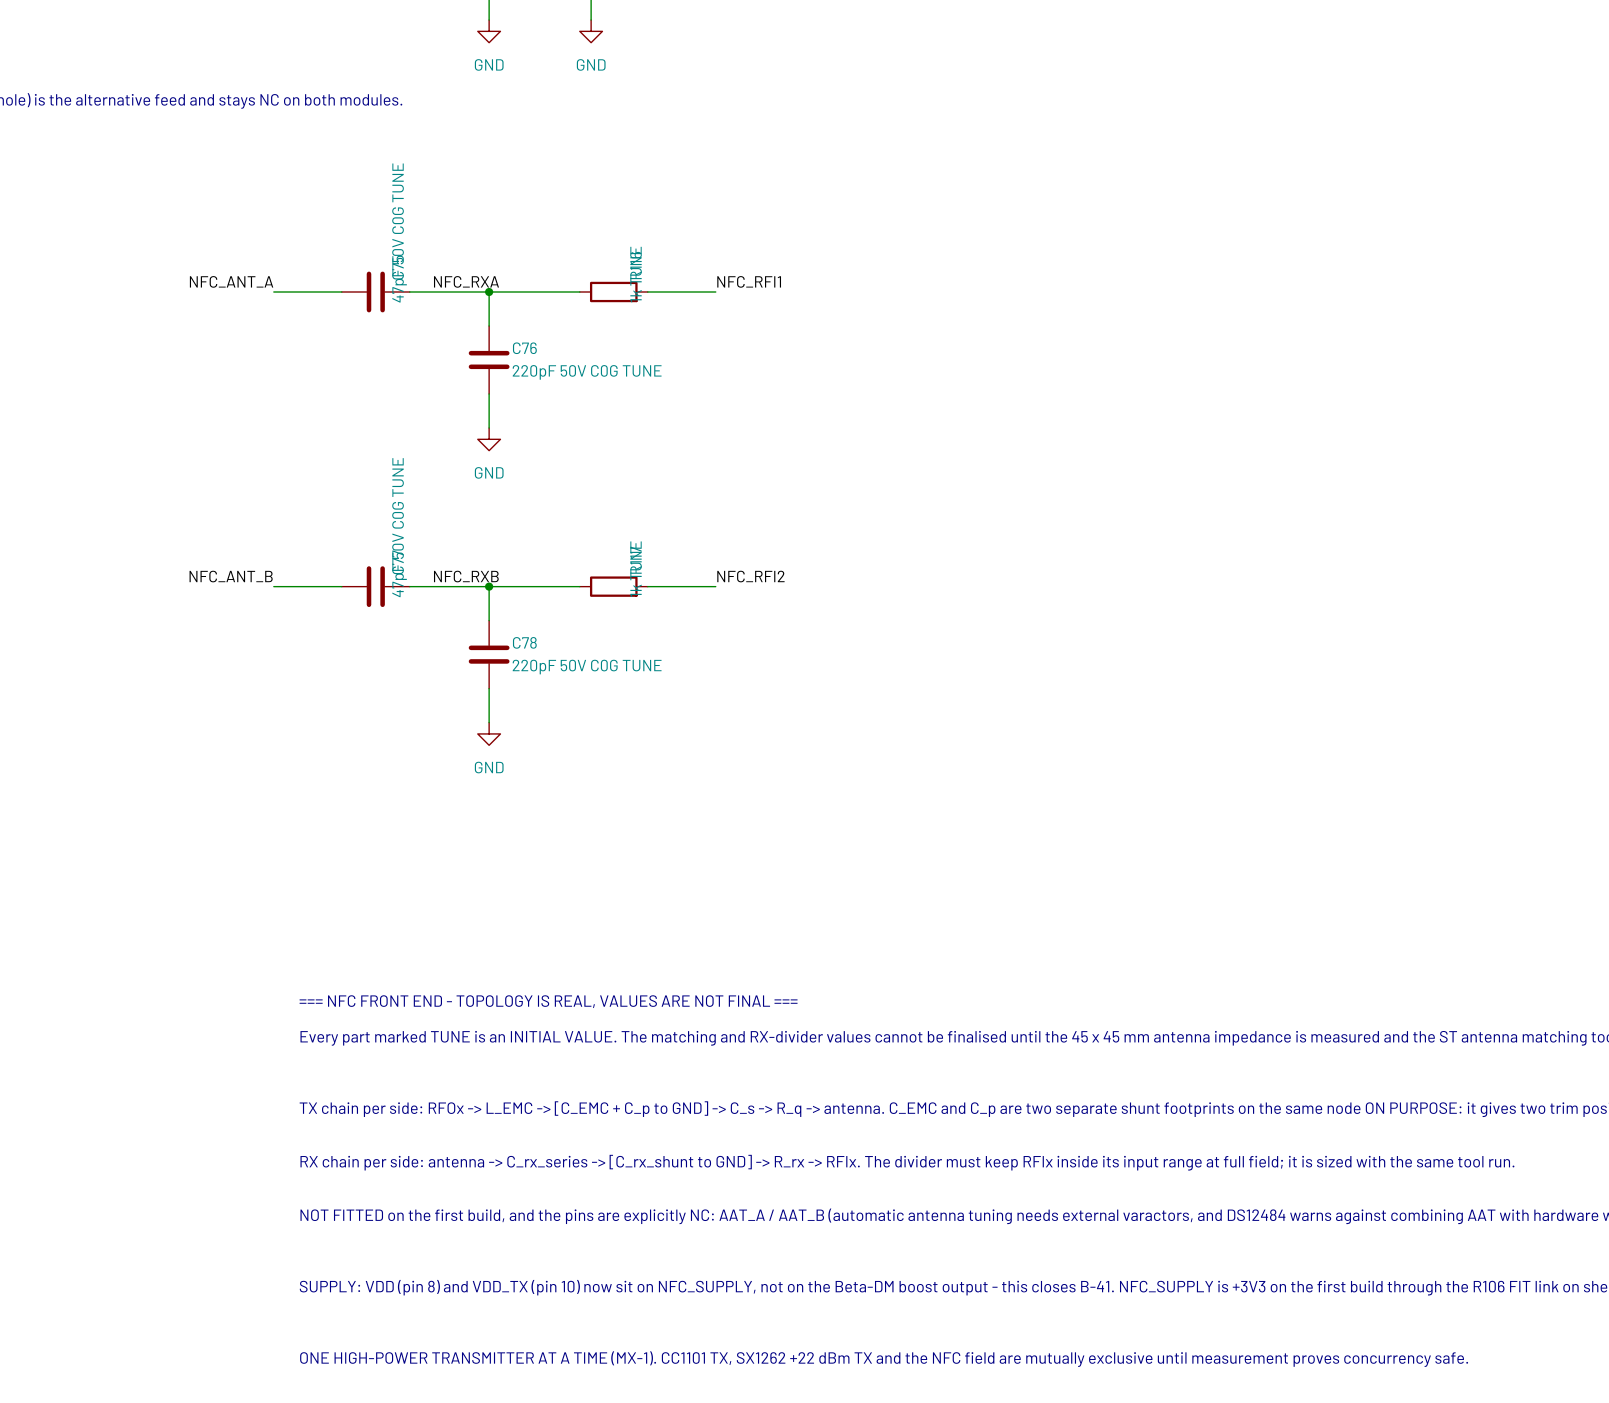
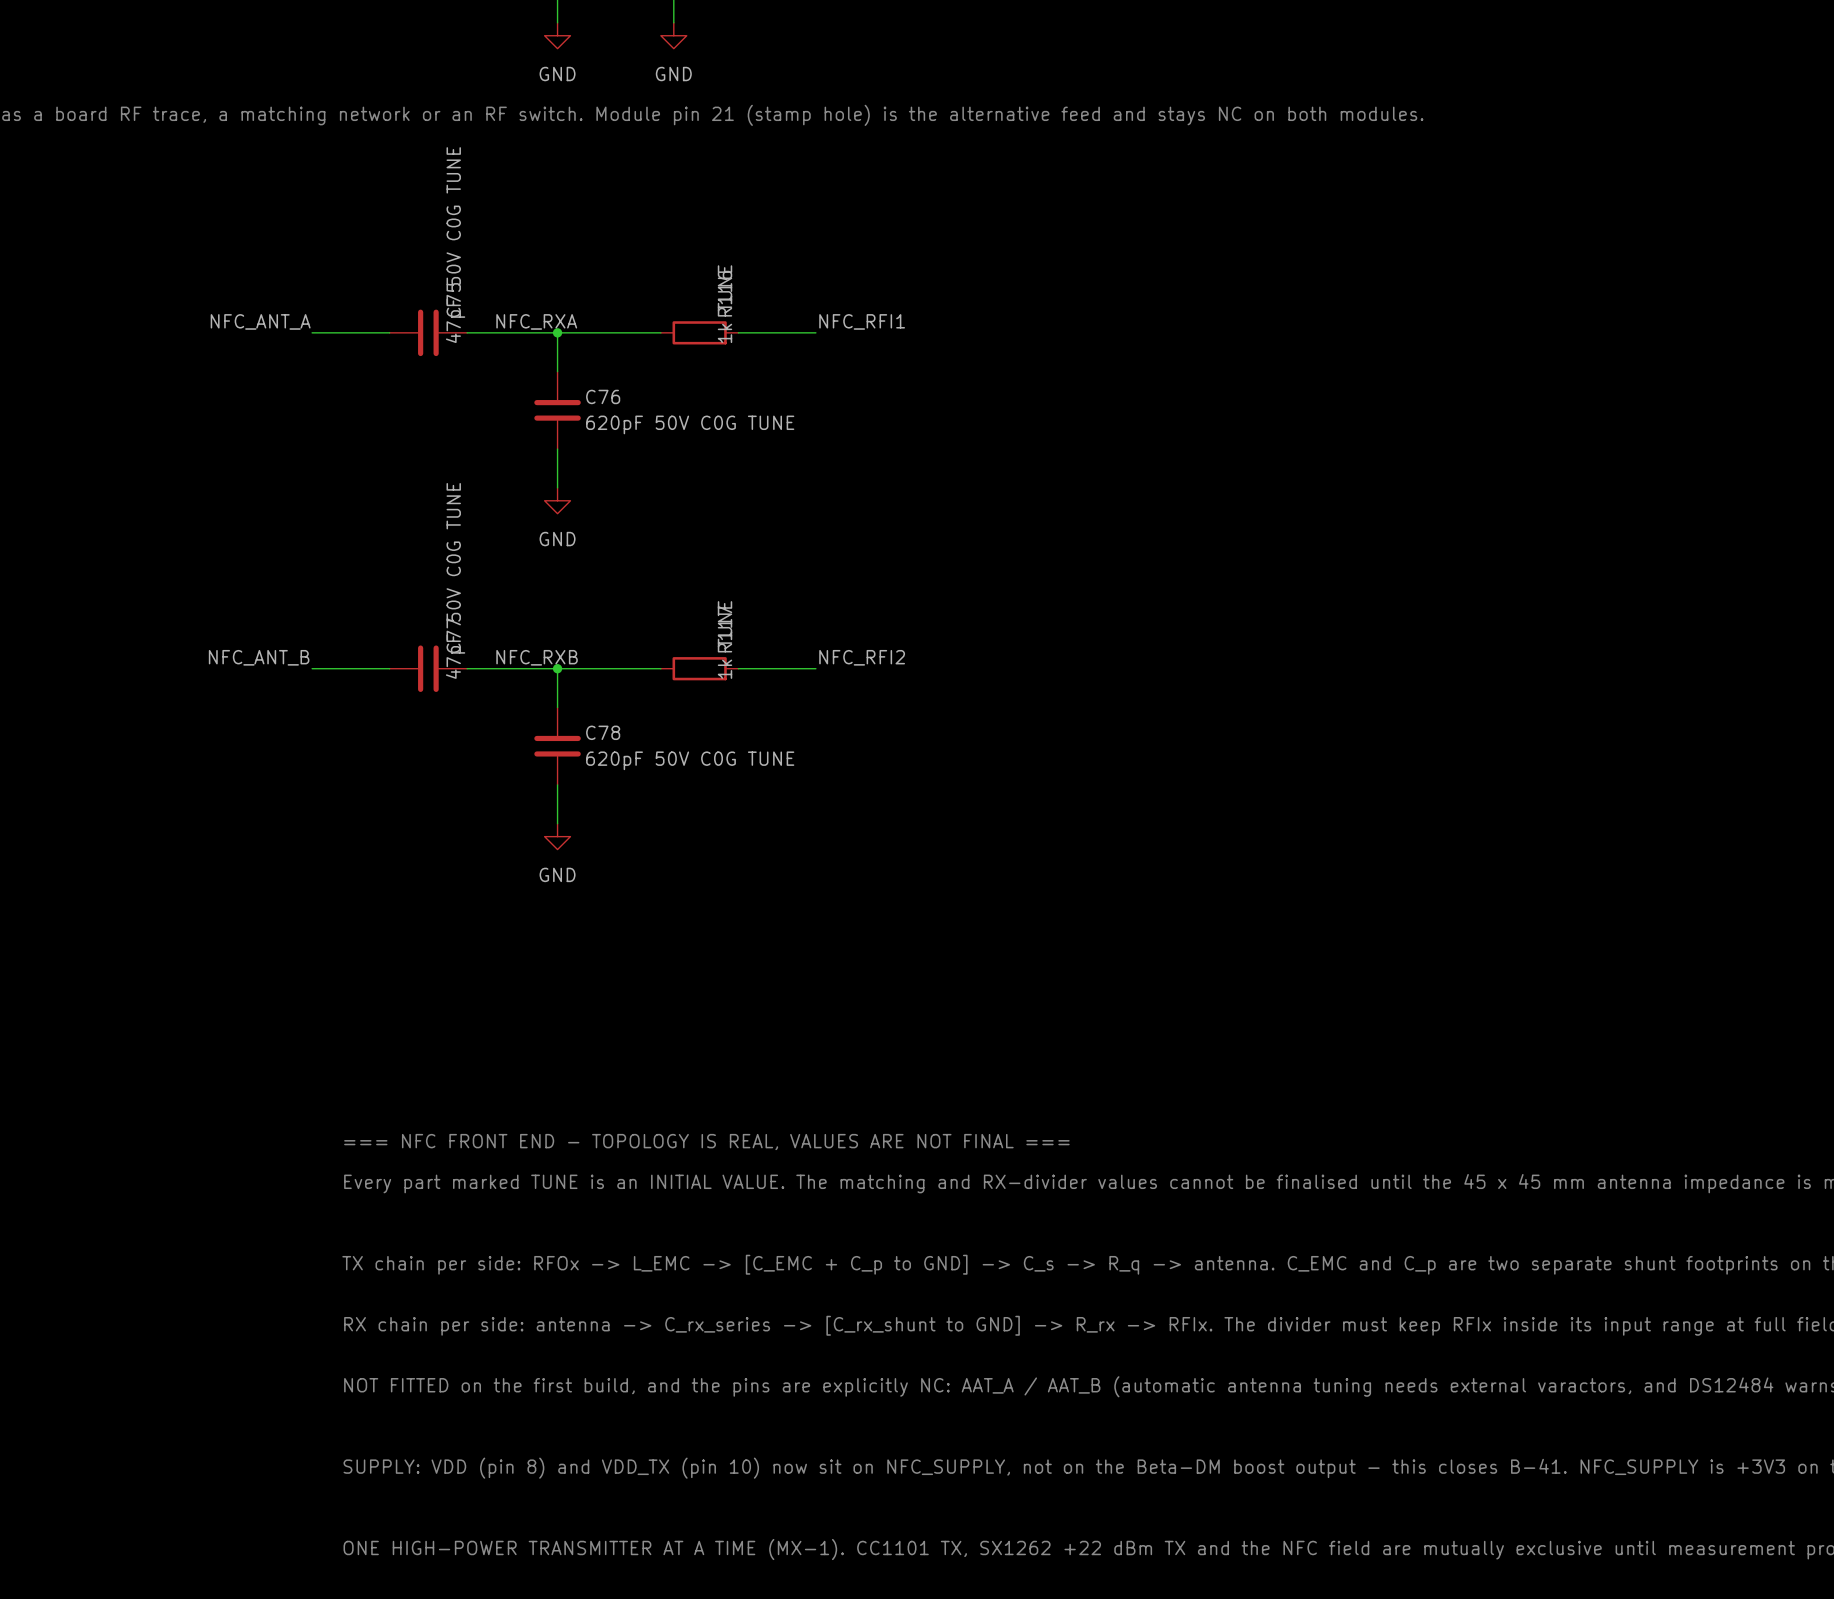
C76 value: 220pF 50V C0G TUNE (587, 372) -> 620pF 50V C0G TUNE (690, 424)
C78 value: 220pF 50V C0G TUNE (587, 667) -> 620pF 50V C0G TUNE (690, 760)

